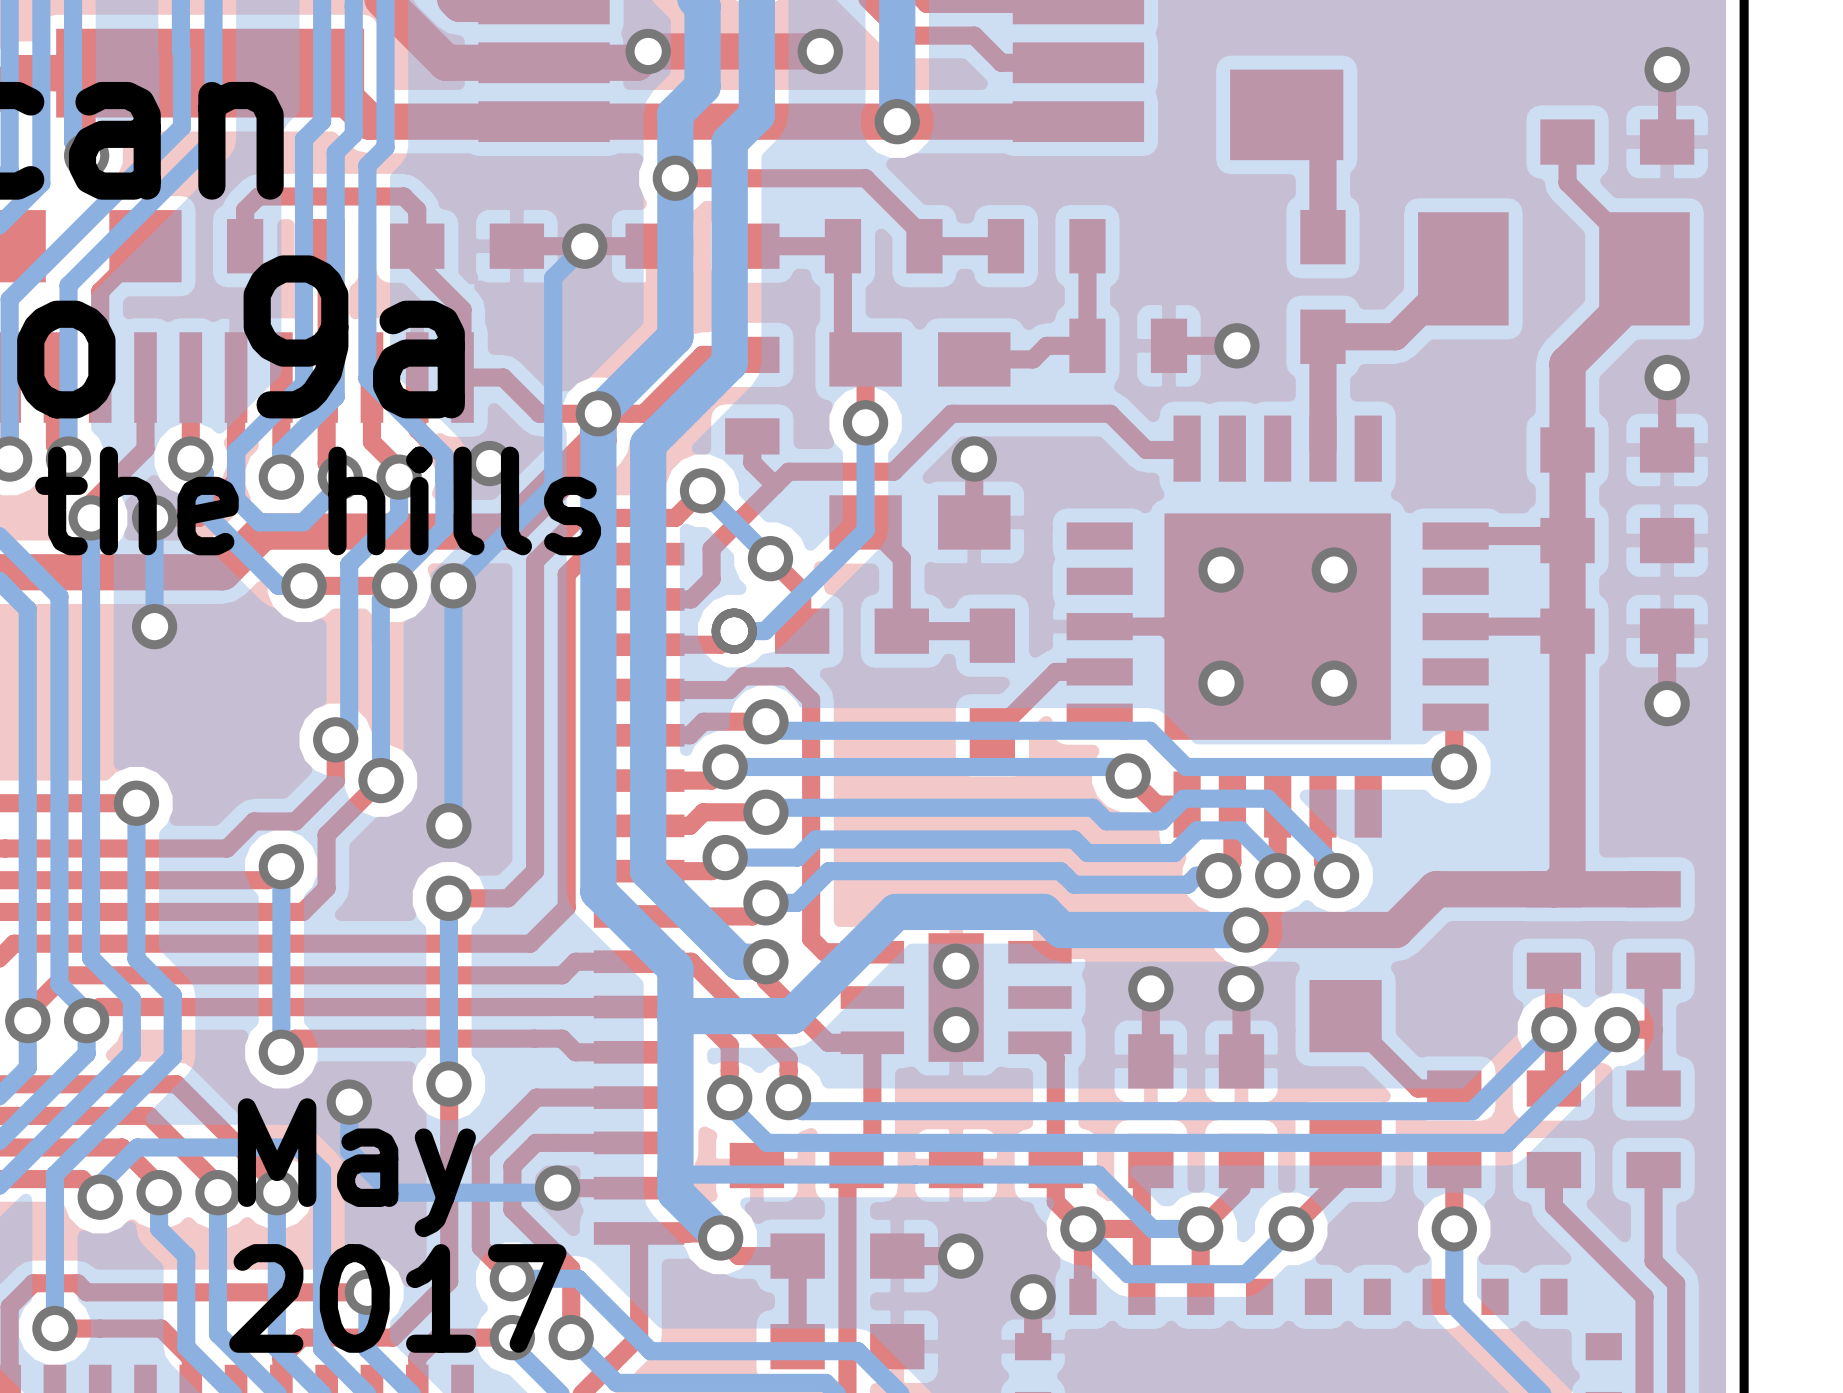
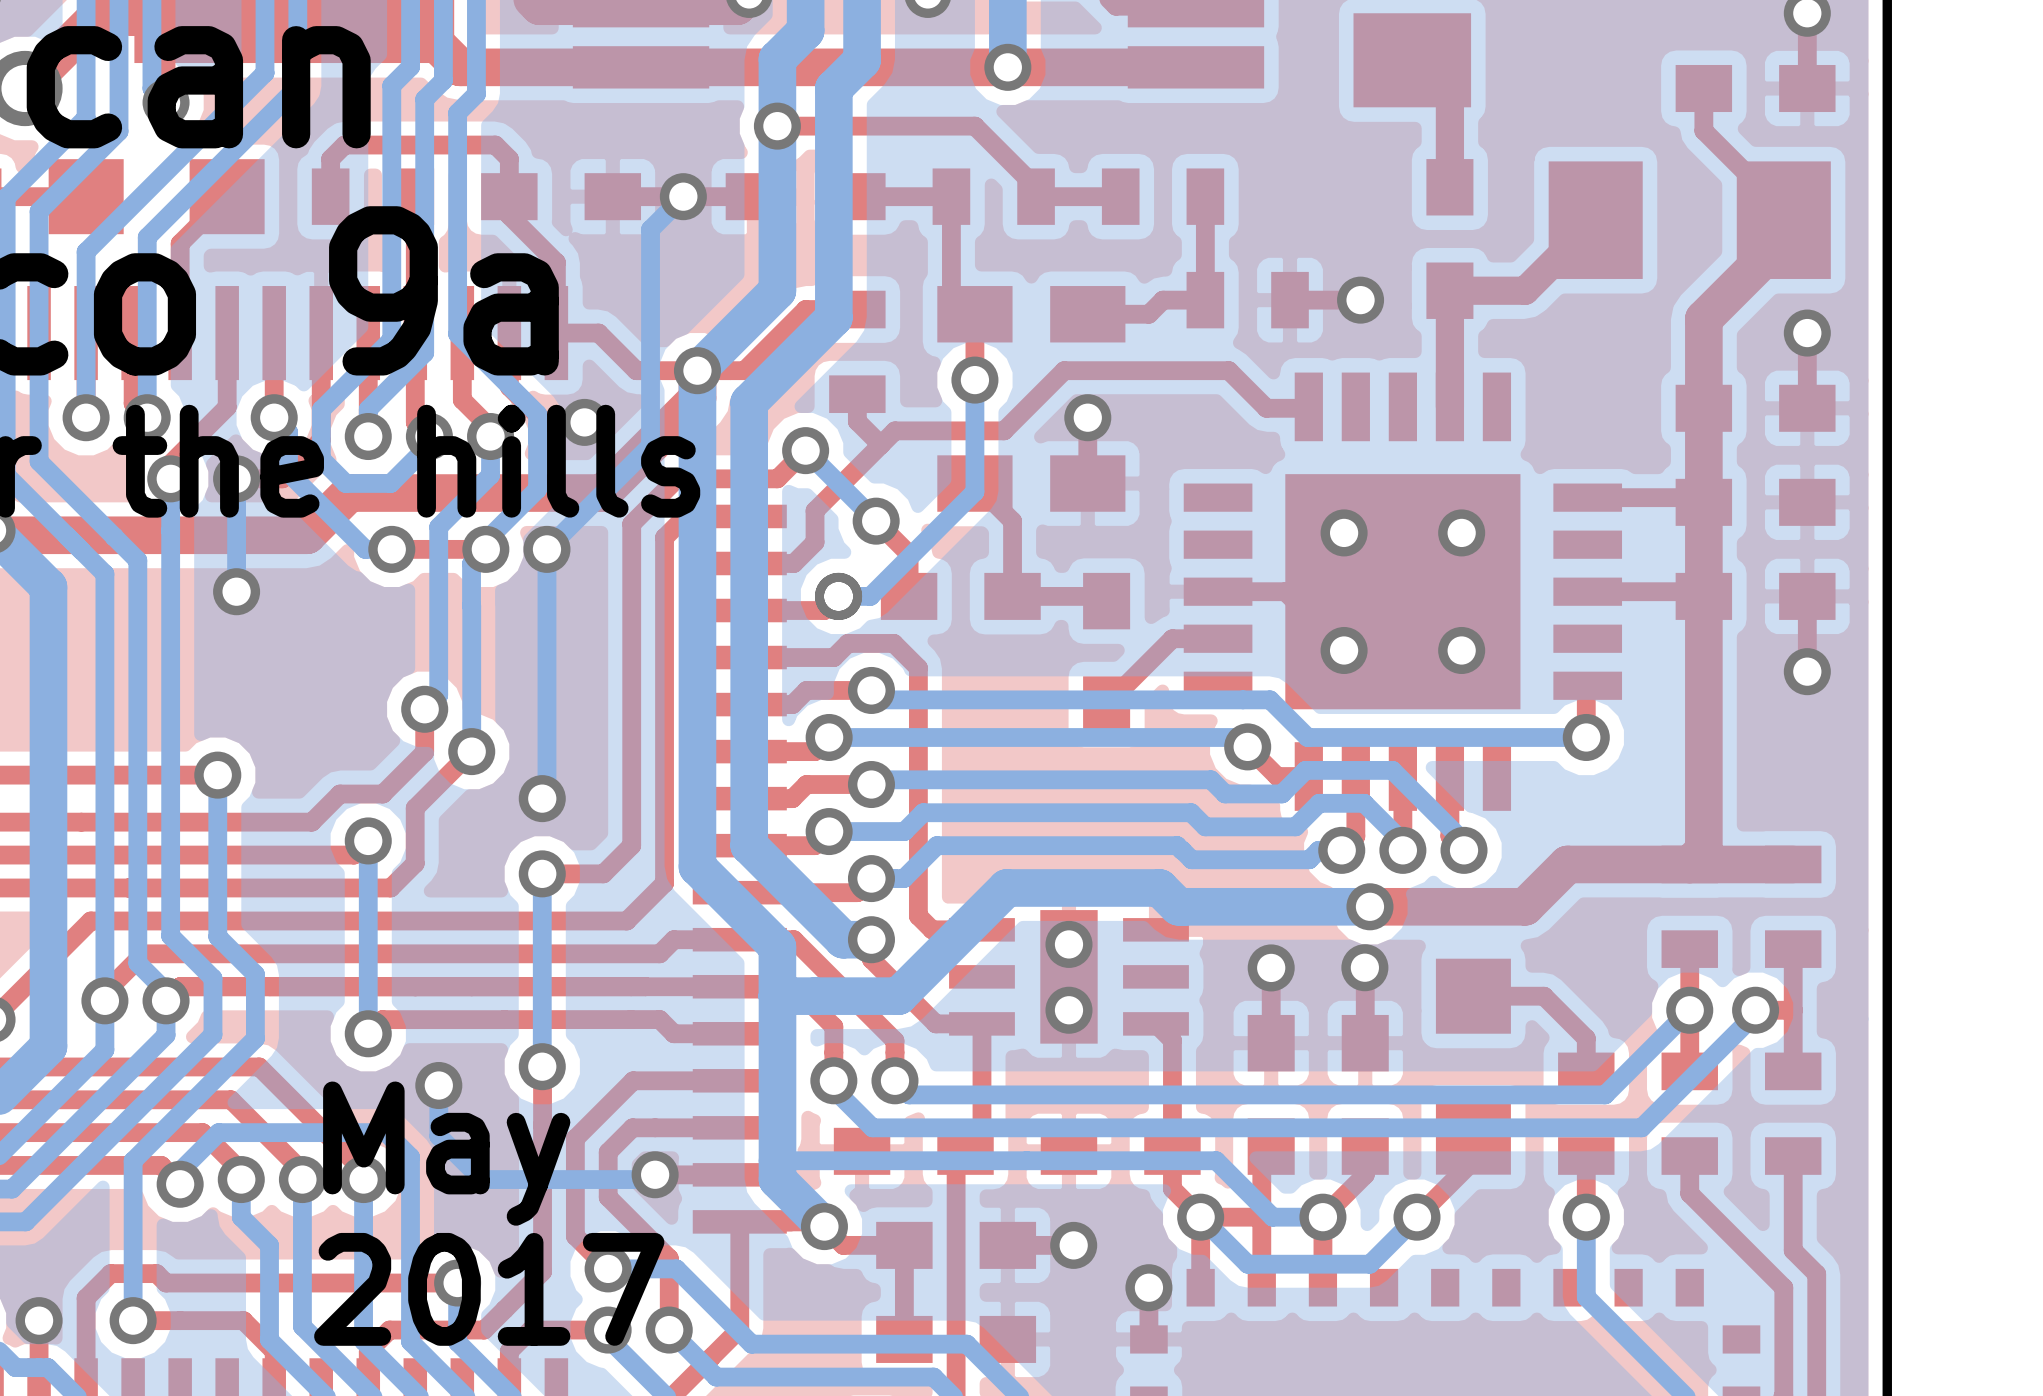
top track: (1345, 1016) (1418, 1088) (1454, 1088) -> (1473, 996) (1544, 996) (1586, 1038) (1586, 1071)

